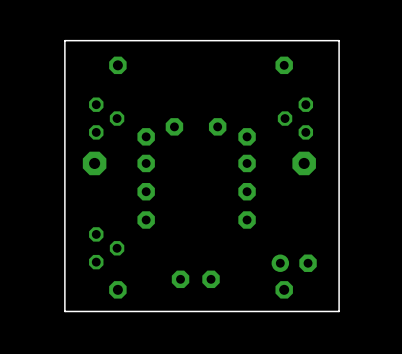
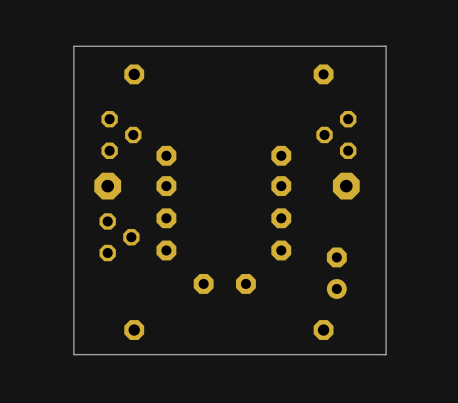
part: (174, 126) -> none
part: (217, 126) -> none
part position: (106, 248) -> (119, 237)
part: none -> (203, 283)
part: none -> (245, 283)
part rotation: 0° (294, 263) -> 90° counterclockwise (336, 273)
part: (180, 279) -> none
part: (211, 279) -> none

